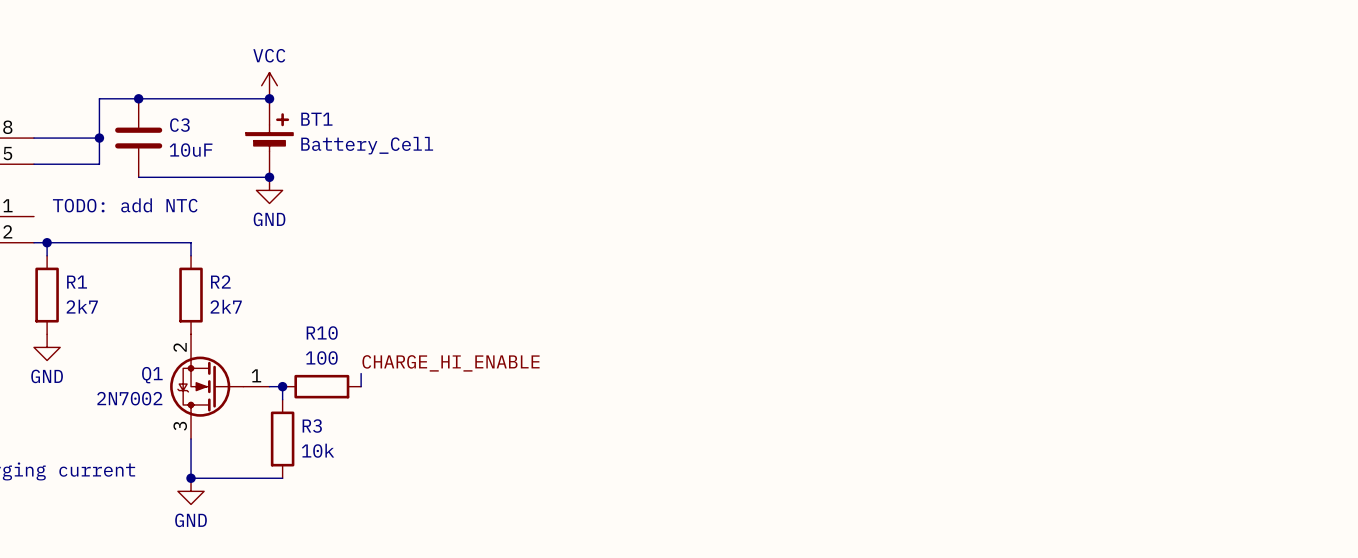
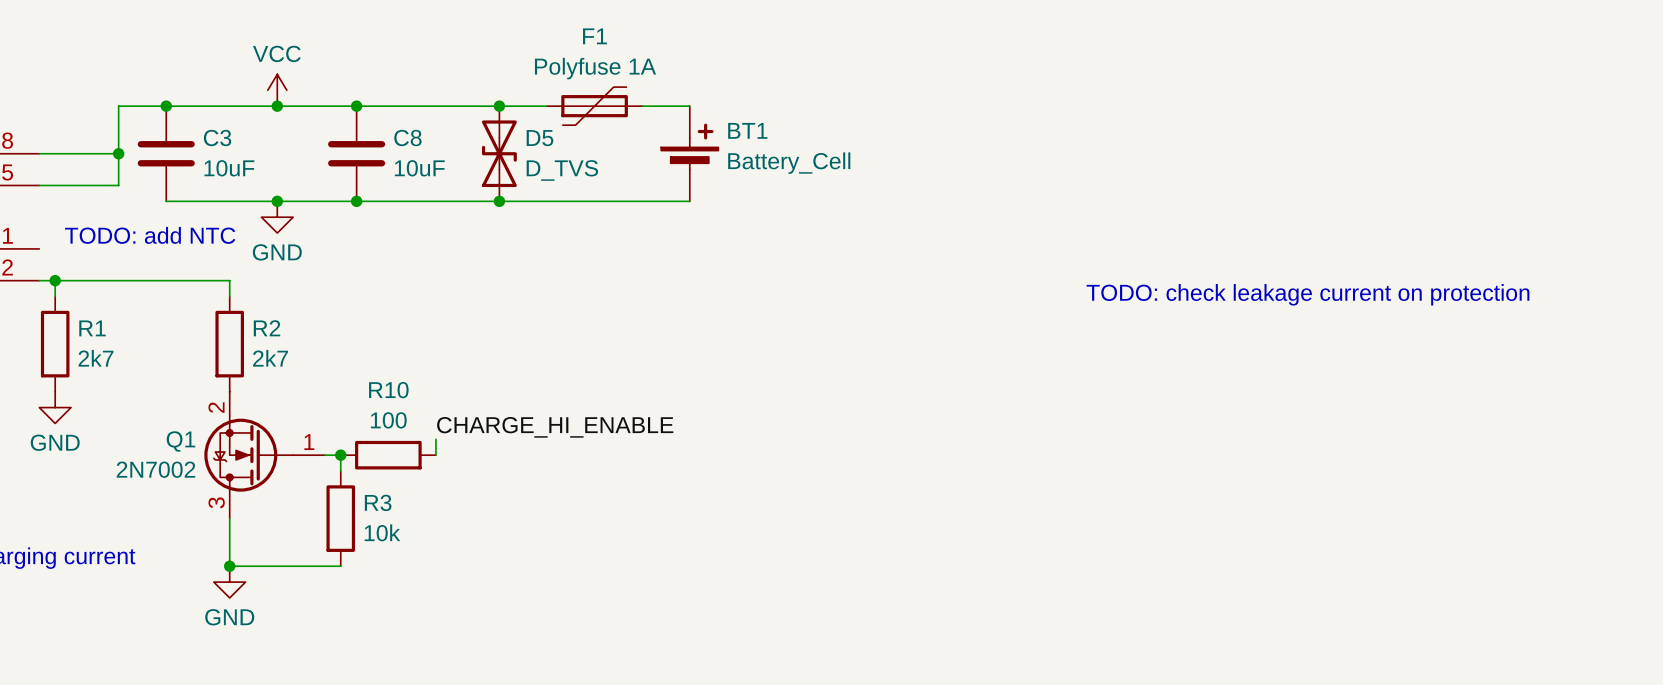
power symbol position: VCC (269, 85) -> VCC (277, 90)
junction: none -> (277, 106)
wire: none -> (324, 106) (547, 106)
junction: (269, 98) -> none
junction: none -> (356, 106)
junction: none -> (499, 106)
F1: none -> Polyfuse 1A (594, 106)
wire: none -> (642, 106) (689, 106)
BT1 position: (269, 138) -> (689, 153)
C8: none -> 10uF (356, 153)
D5: none -> D_TVS (499, 153)
junction: none -> (277, 201)
wire: none -> (324, 201) (689, 201)
junction: (269, 177) -> none
junction: none -> (356, 201)
junction: none -> (499, 201)
power symbol position: GND (269, 190) -> GND (277, 217)
text: none -> TODO: check leakage current on protection (1308, 294)

